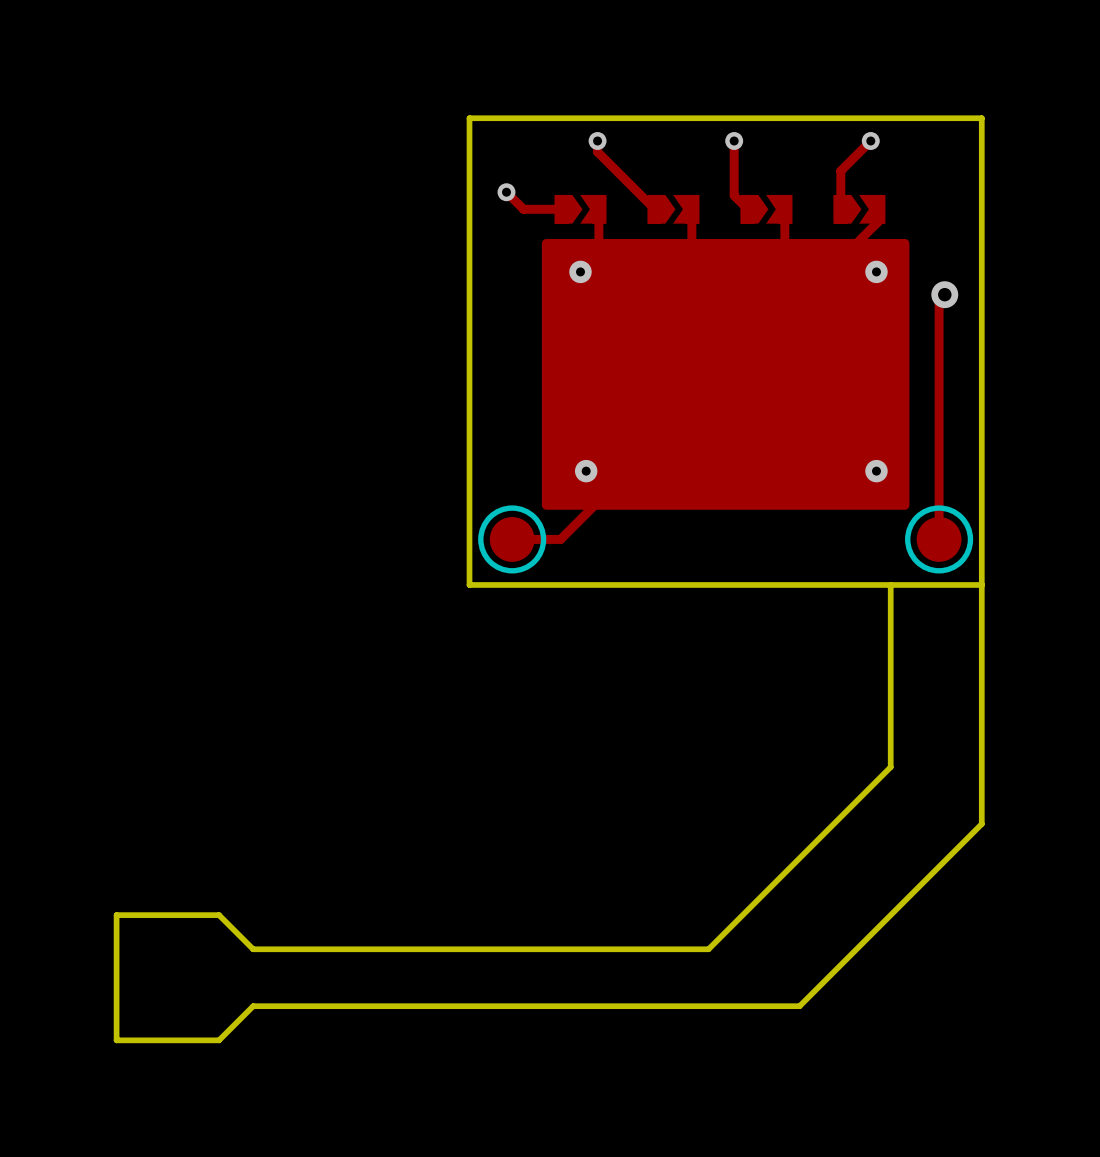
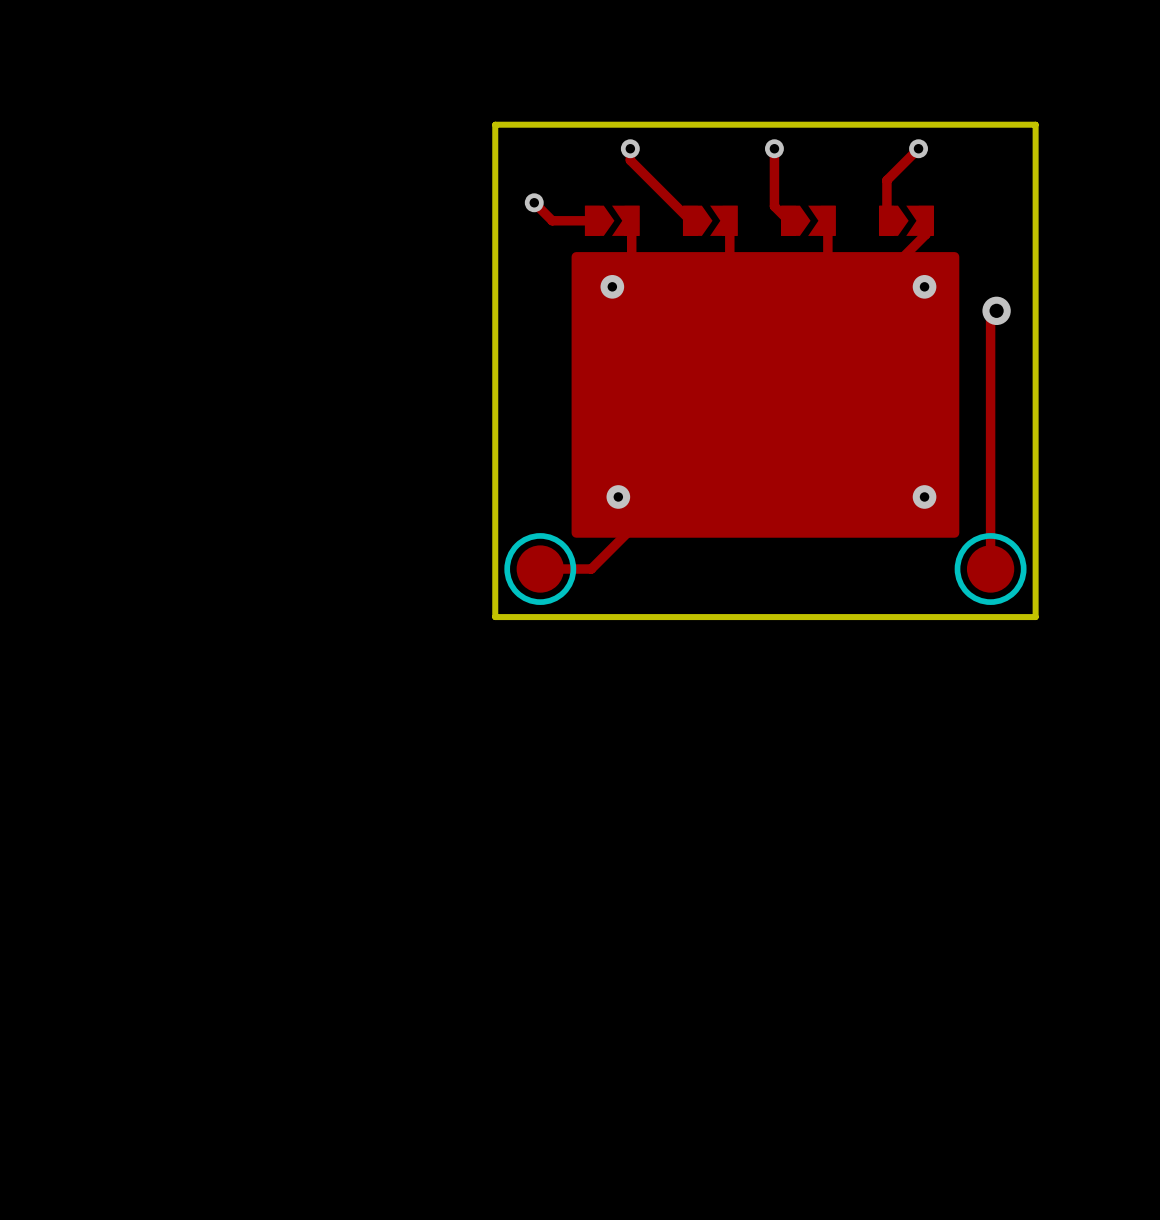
board edge: (890, 584) (890, 767) (708, 949) (253, 949) (219, 915) (116, 915) (116, 1040) (219, 1040) (253, 1006) (799, 1006) (981, 824) (981, 584) -> none

